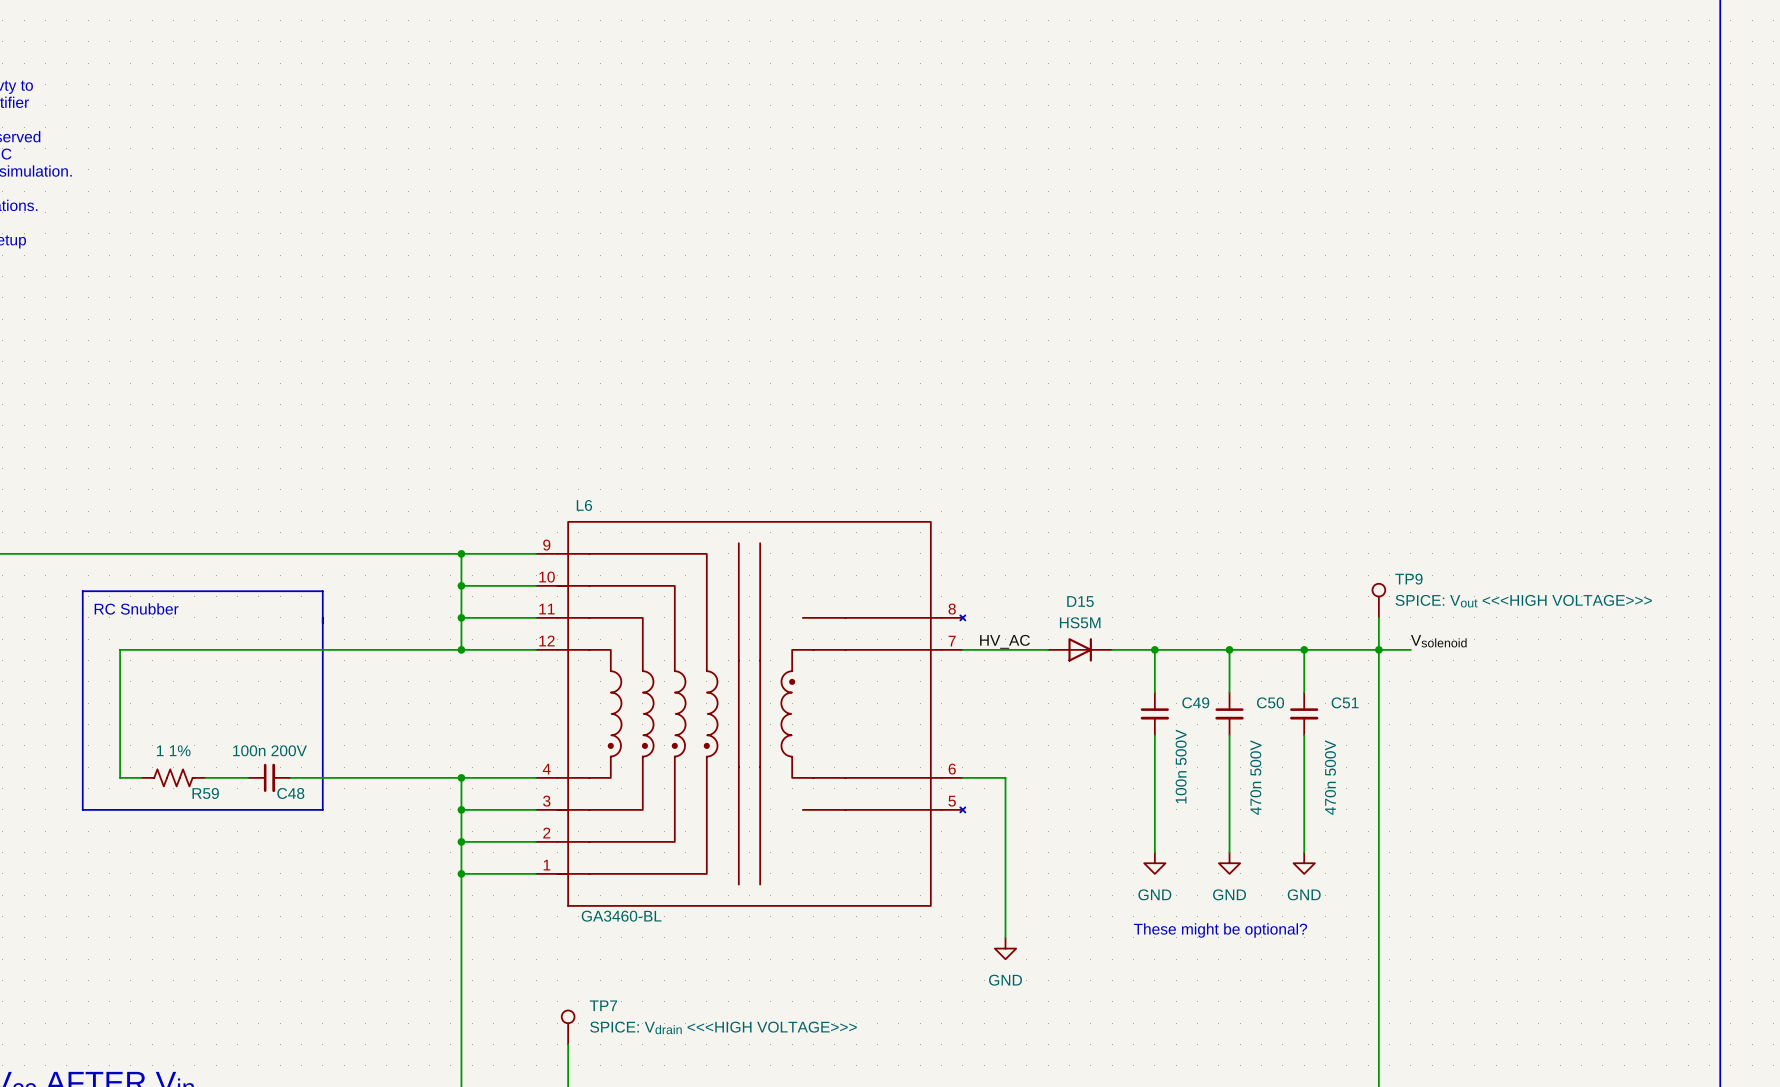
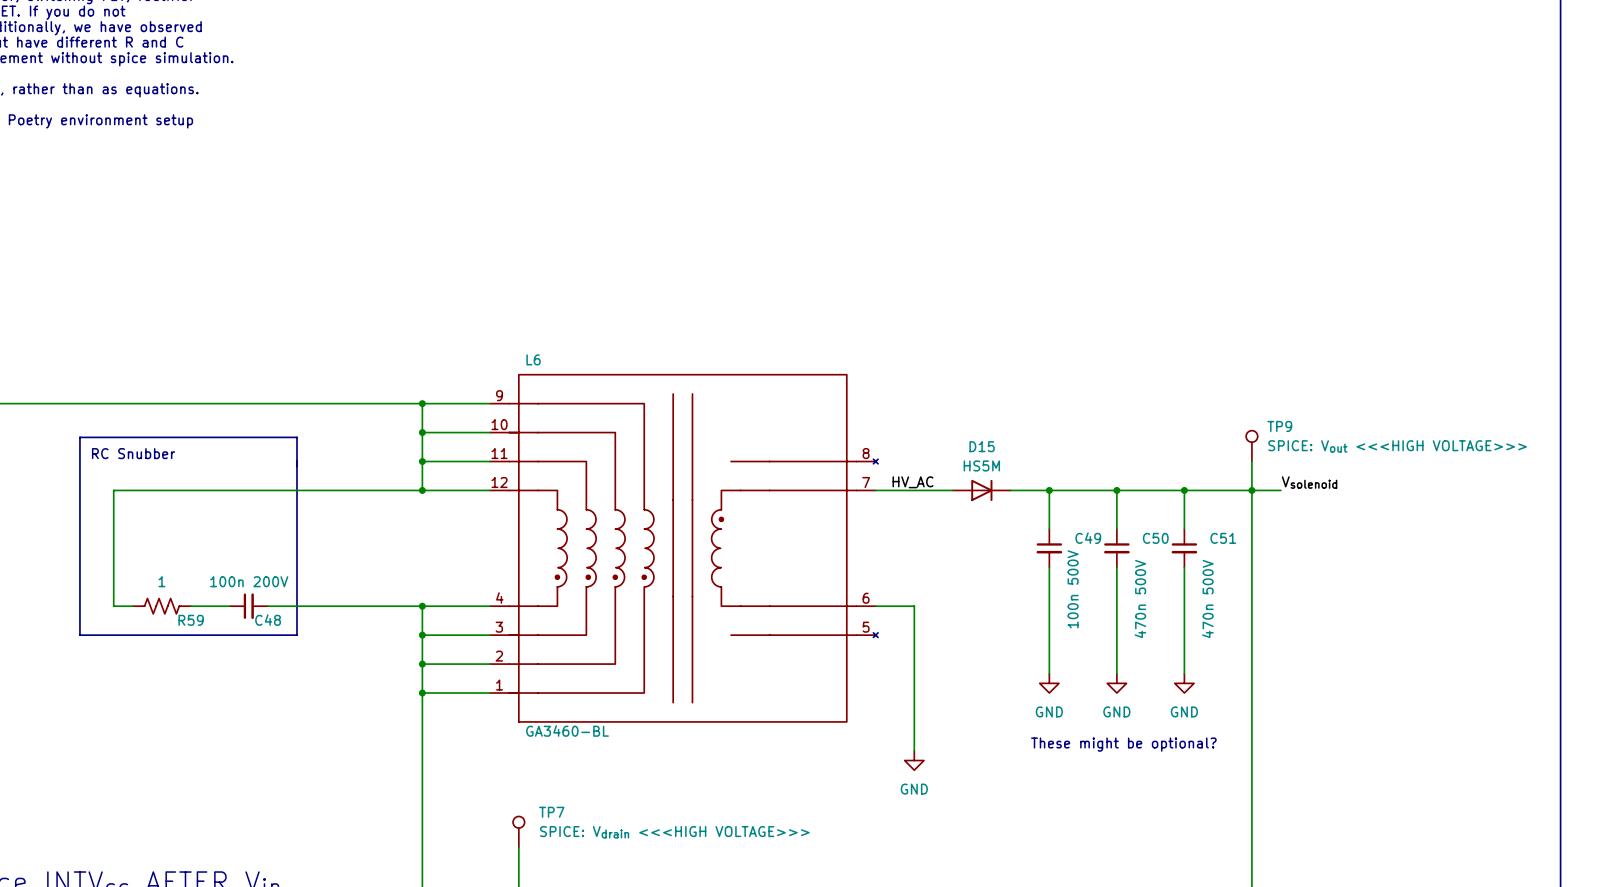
R59 value: 1 1% (173, 750) -> 1 (161, 581)

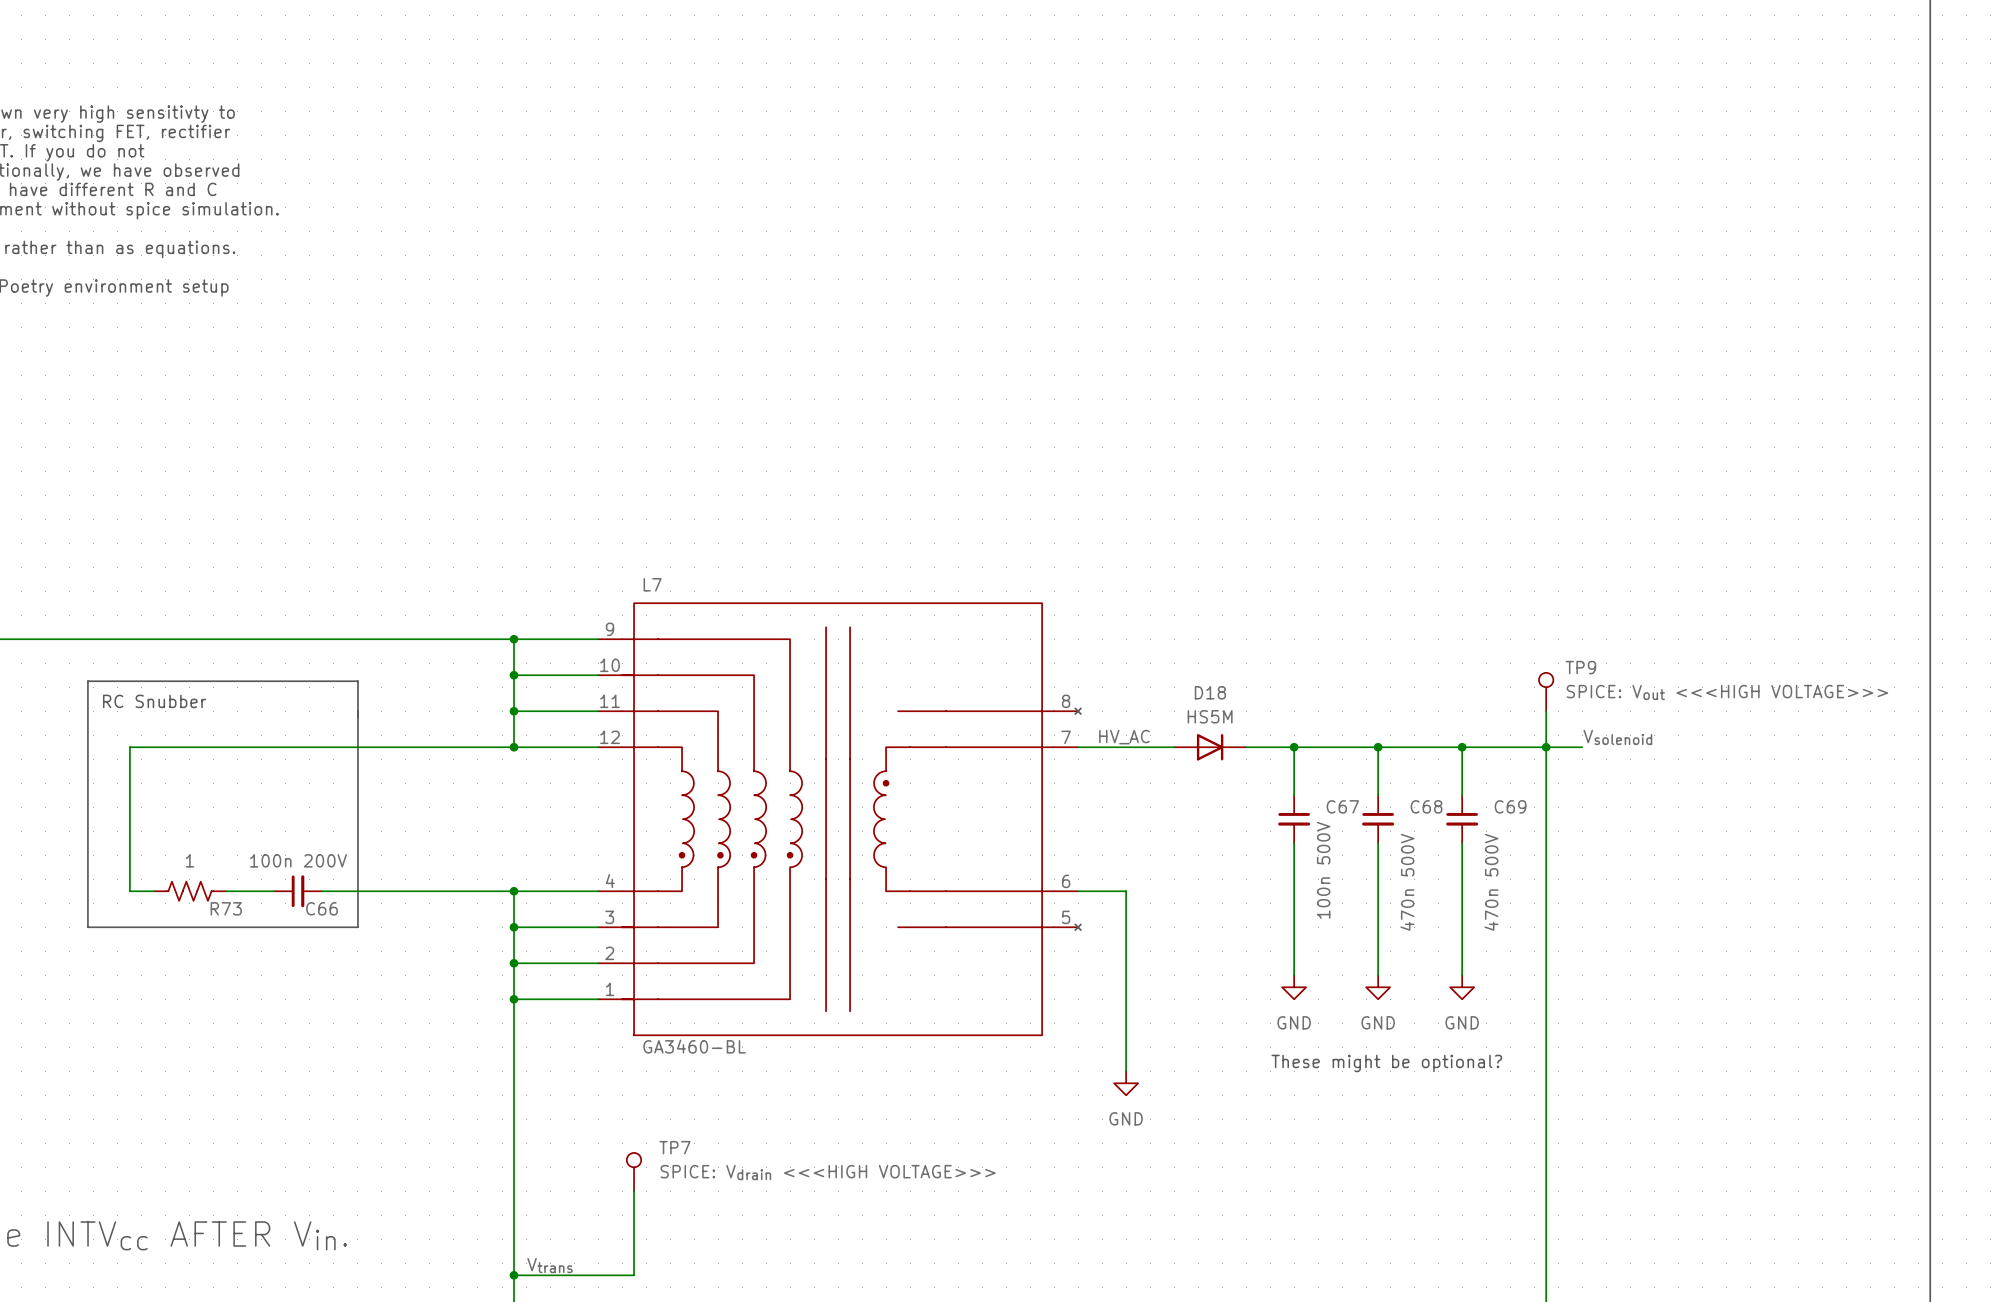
L6 name: L6 (533, 359) -> L7 (652, 584)
D15 name: D15 (982, 446) -> D18 (1210, 692)
C49 name: C49 (1088, 538) -> C67 (1342, 806)
C50 name: C50 (1155, 538) -> C68 (1426, 806)
C51 name: C51 (1223, 538) -> C69 (1510, 806)
R59 name: R59 (191, 620) -> R73 (226, 908)
C48 name: C48 (268, 620) -> C66 (321, 908)

